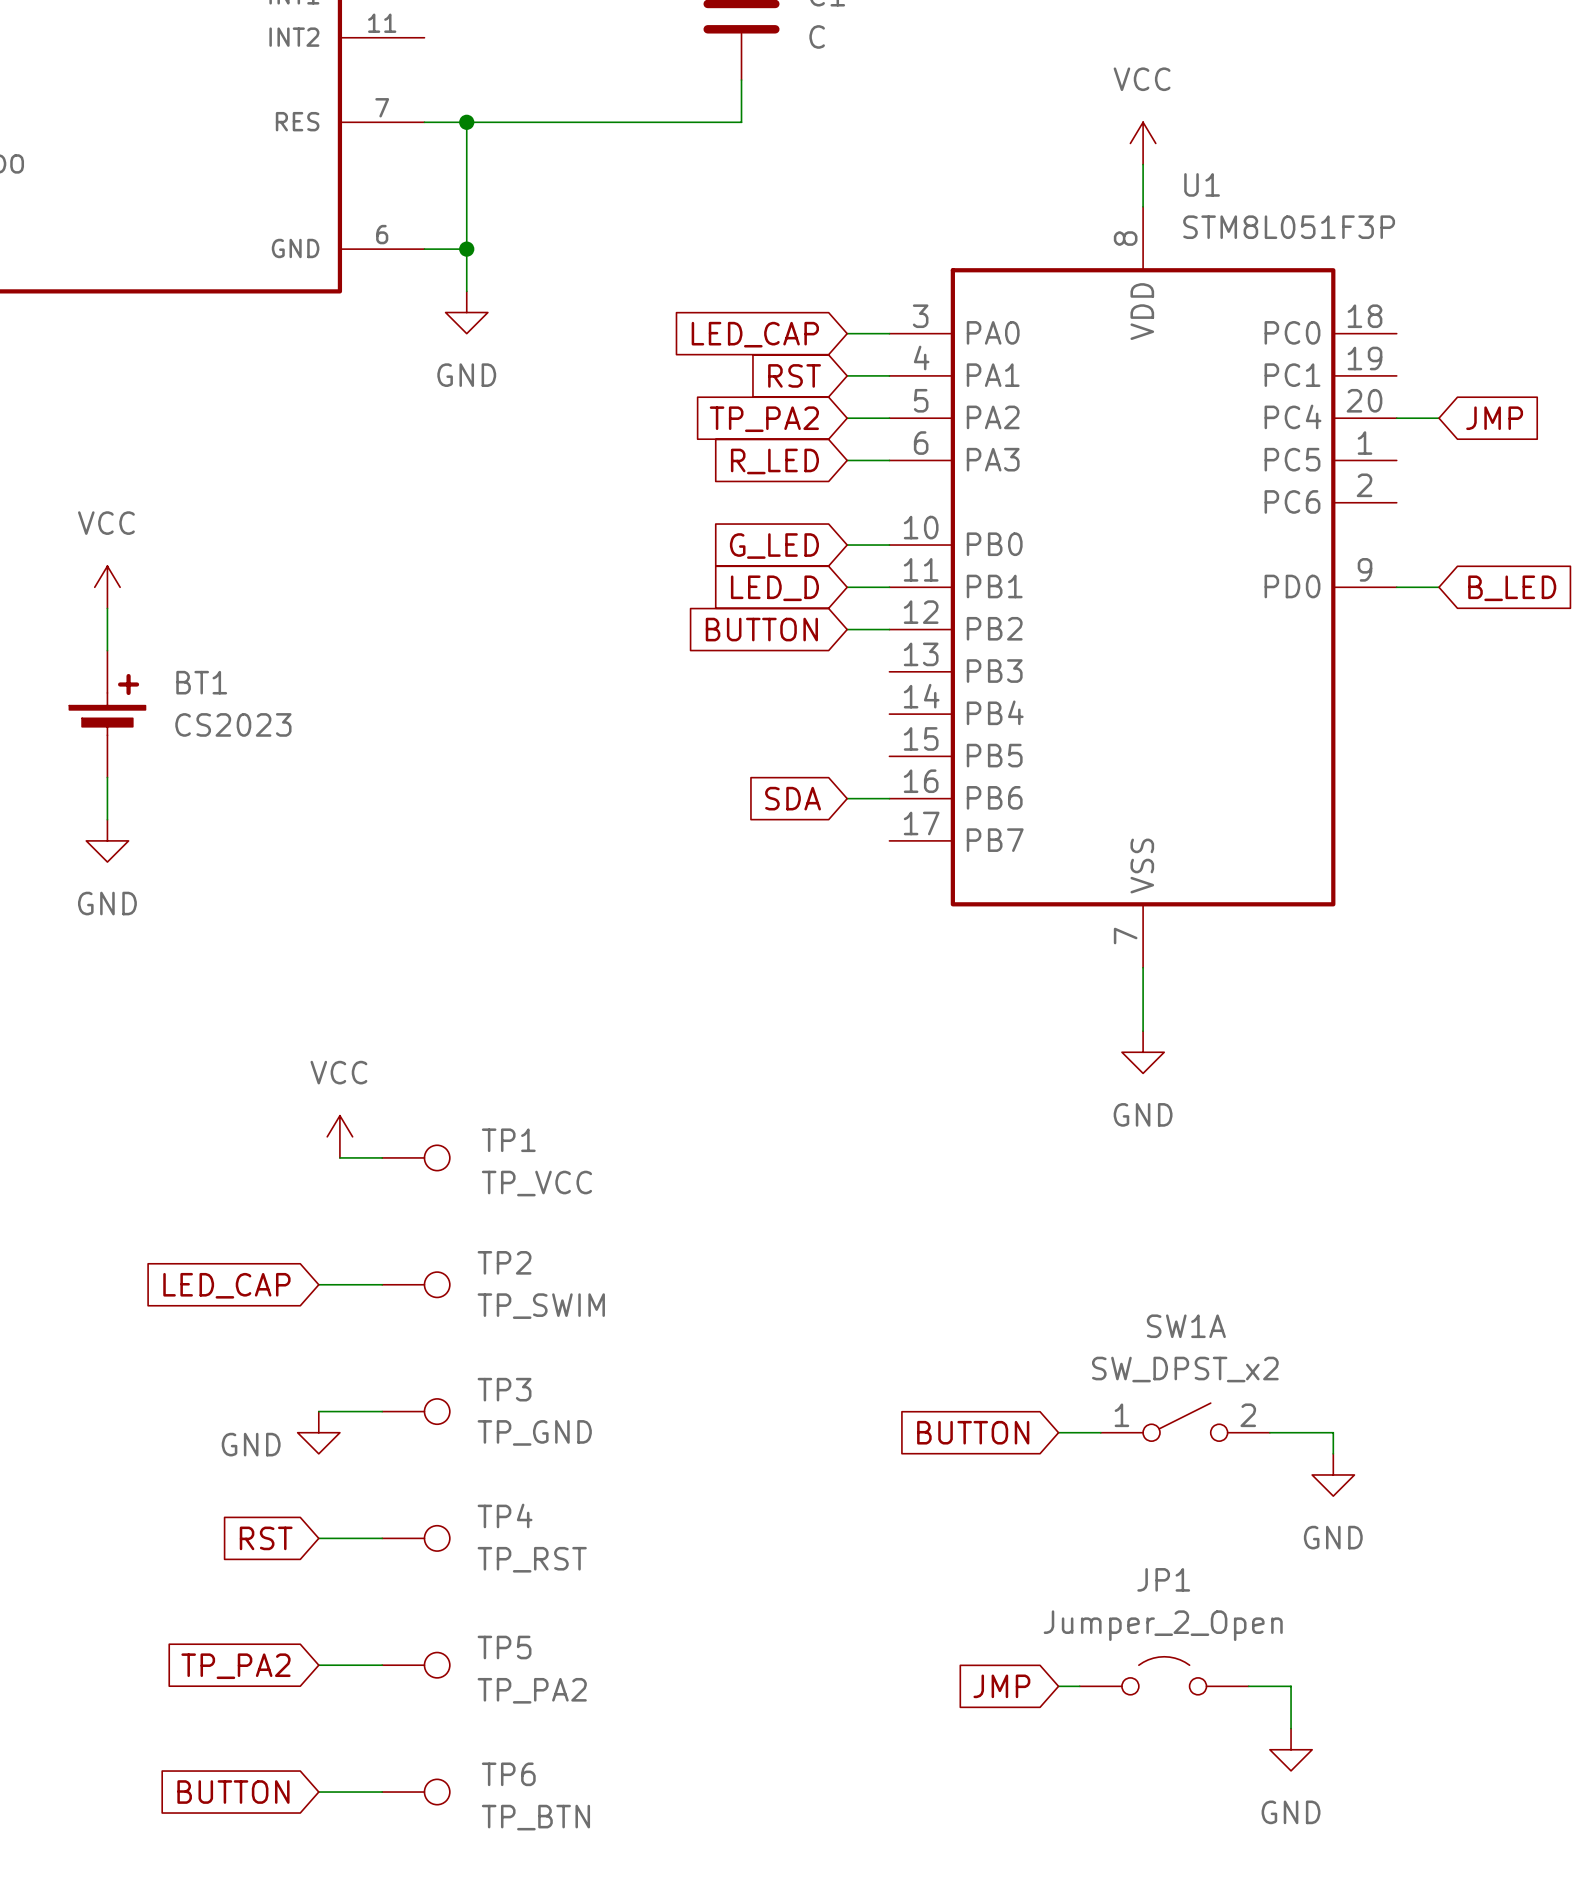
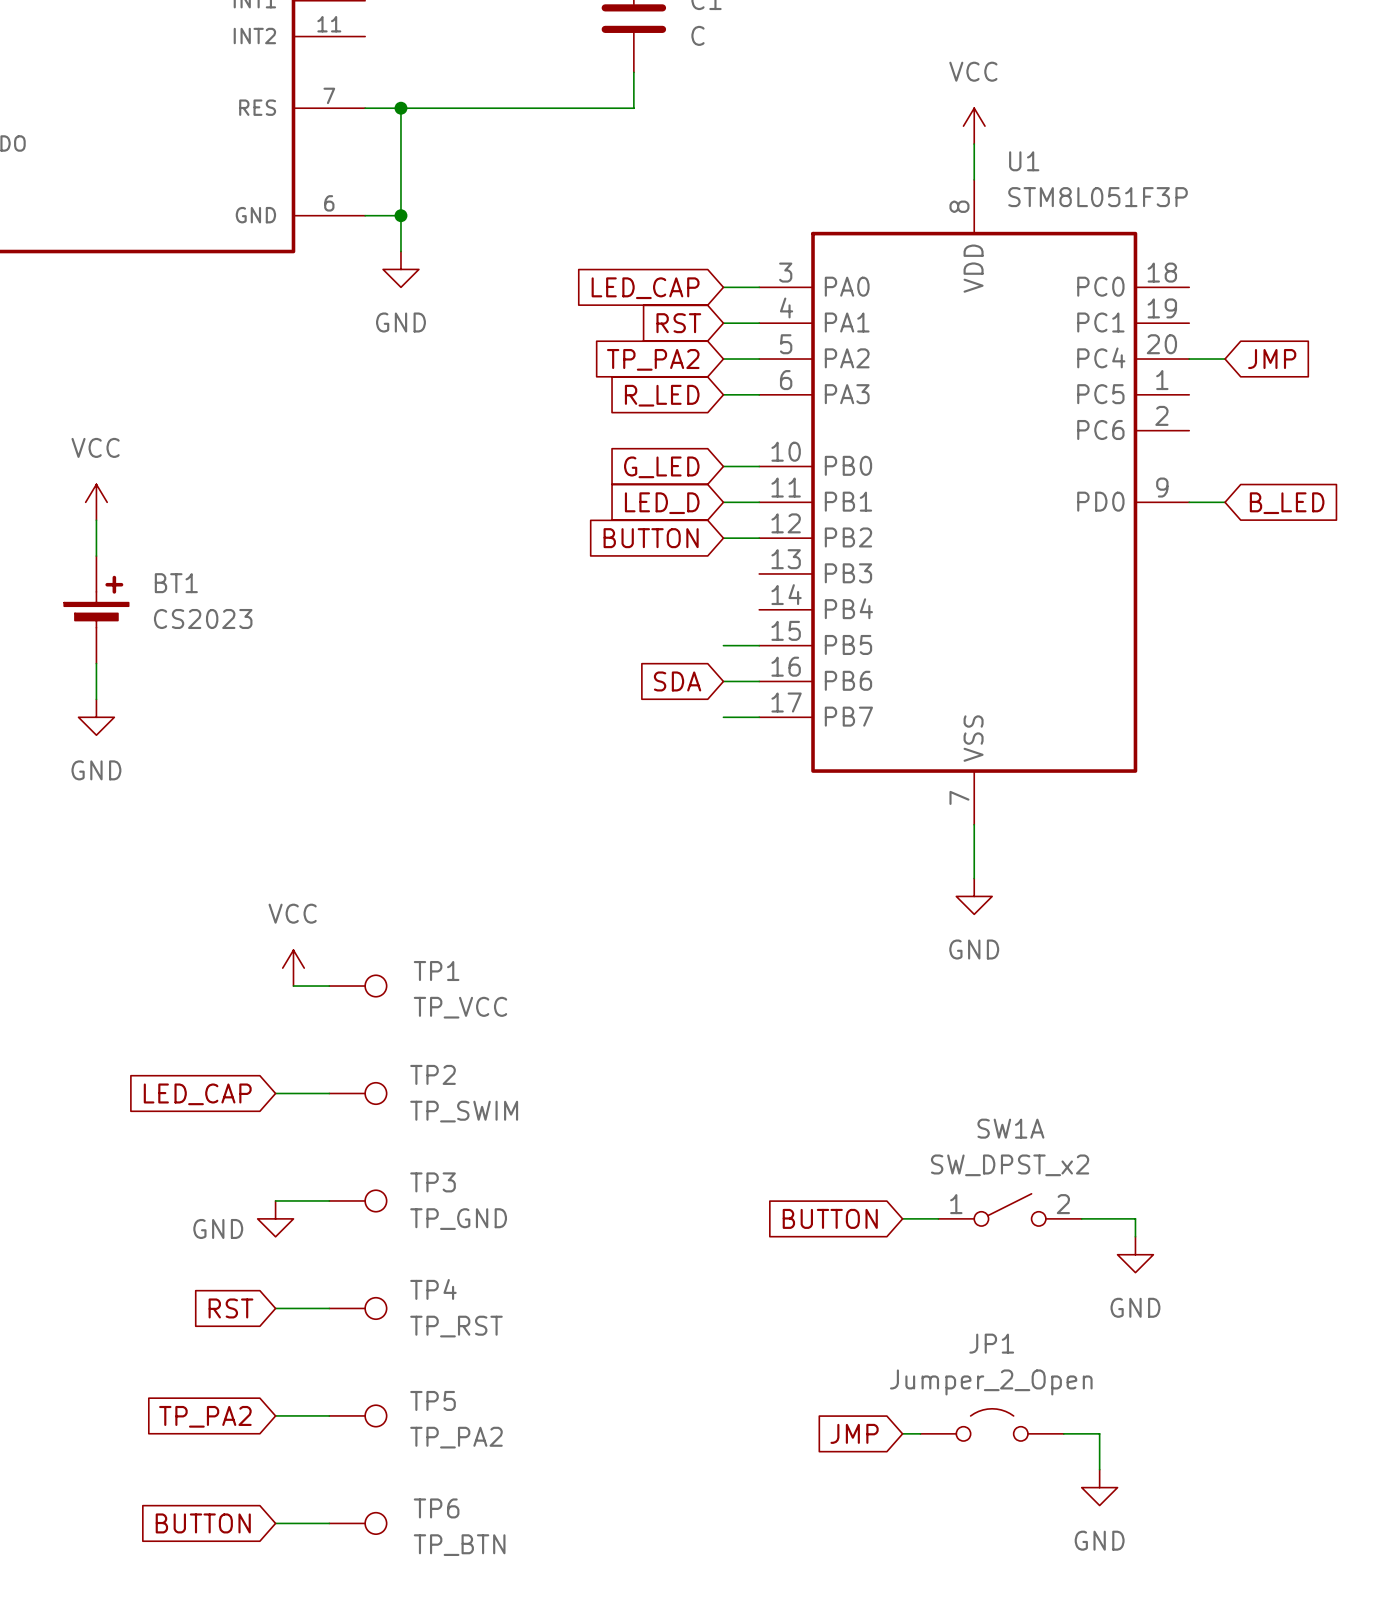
wire: none -> (723, 645) (759, 645)
wire: none -> (723, 717) (759, 717)

